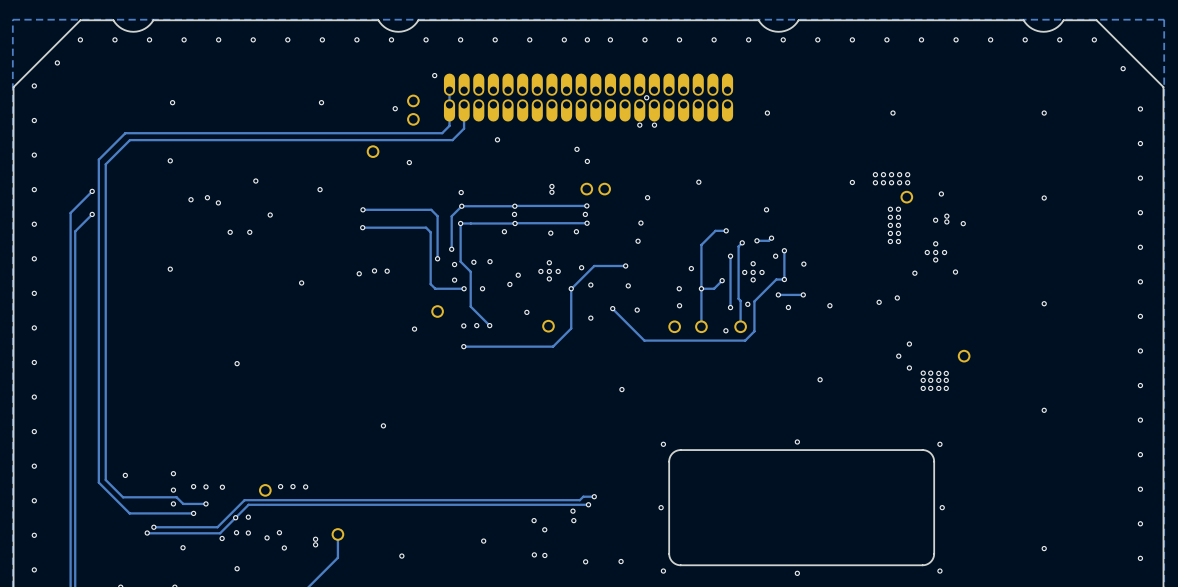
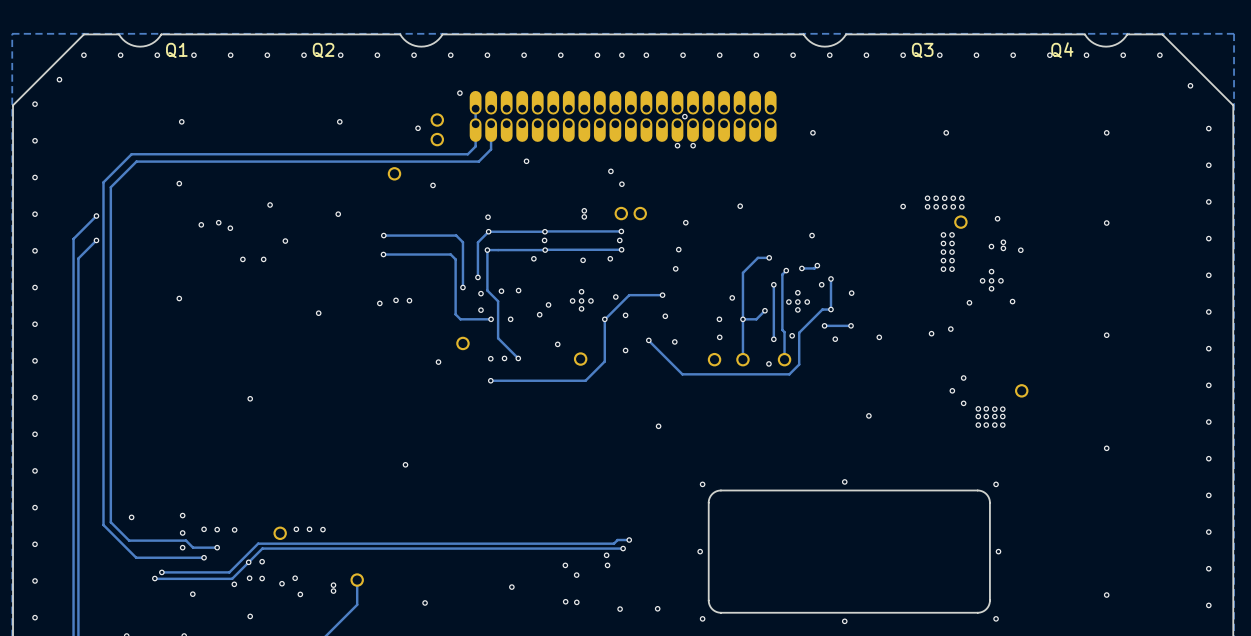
text: none -> Q1 (176, 50)
text: none -> Q2 (323, 50)
text: none -> Q3 (922, 50)
text: none -> Q4 (1062, 50)

